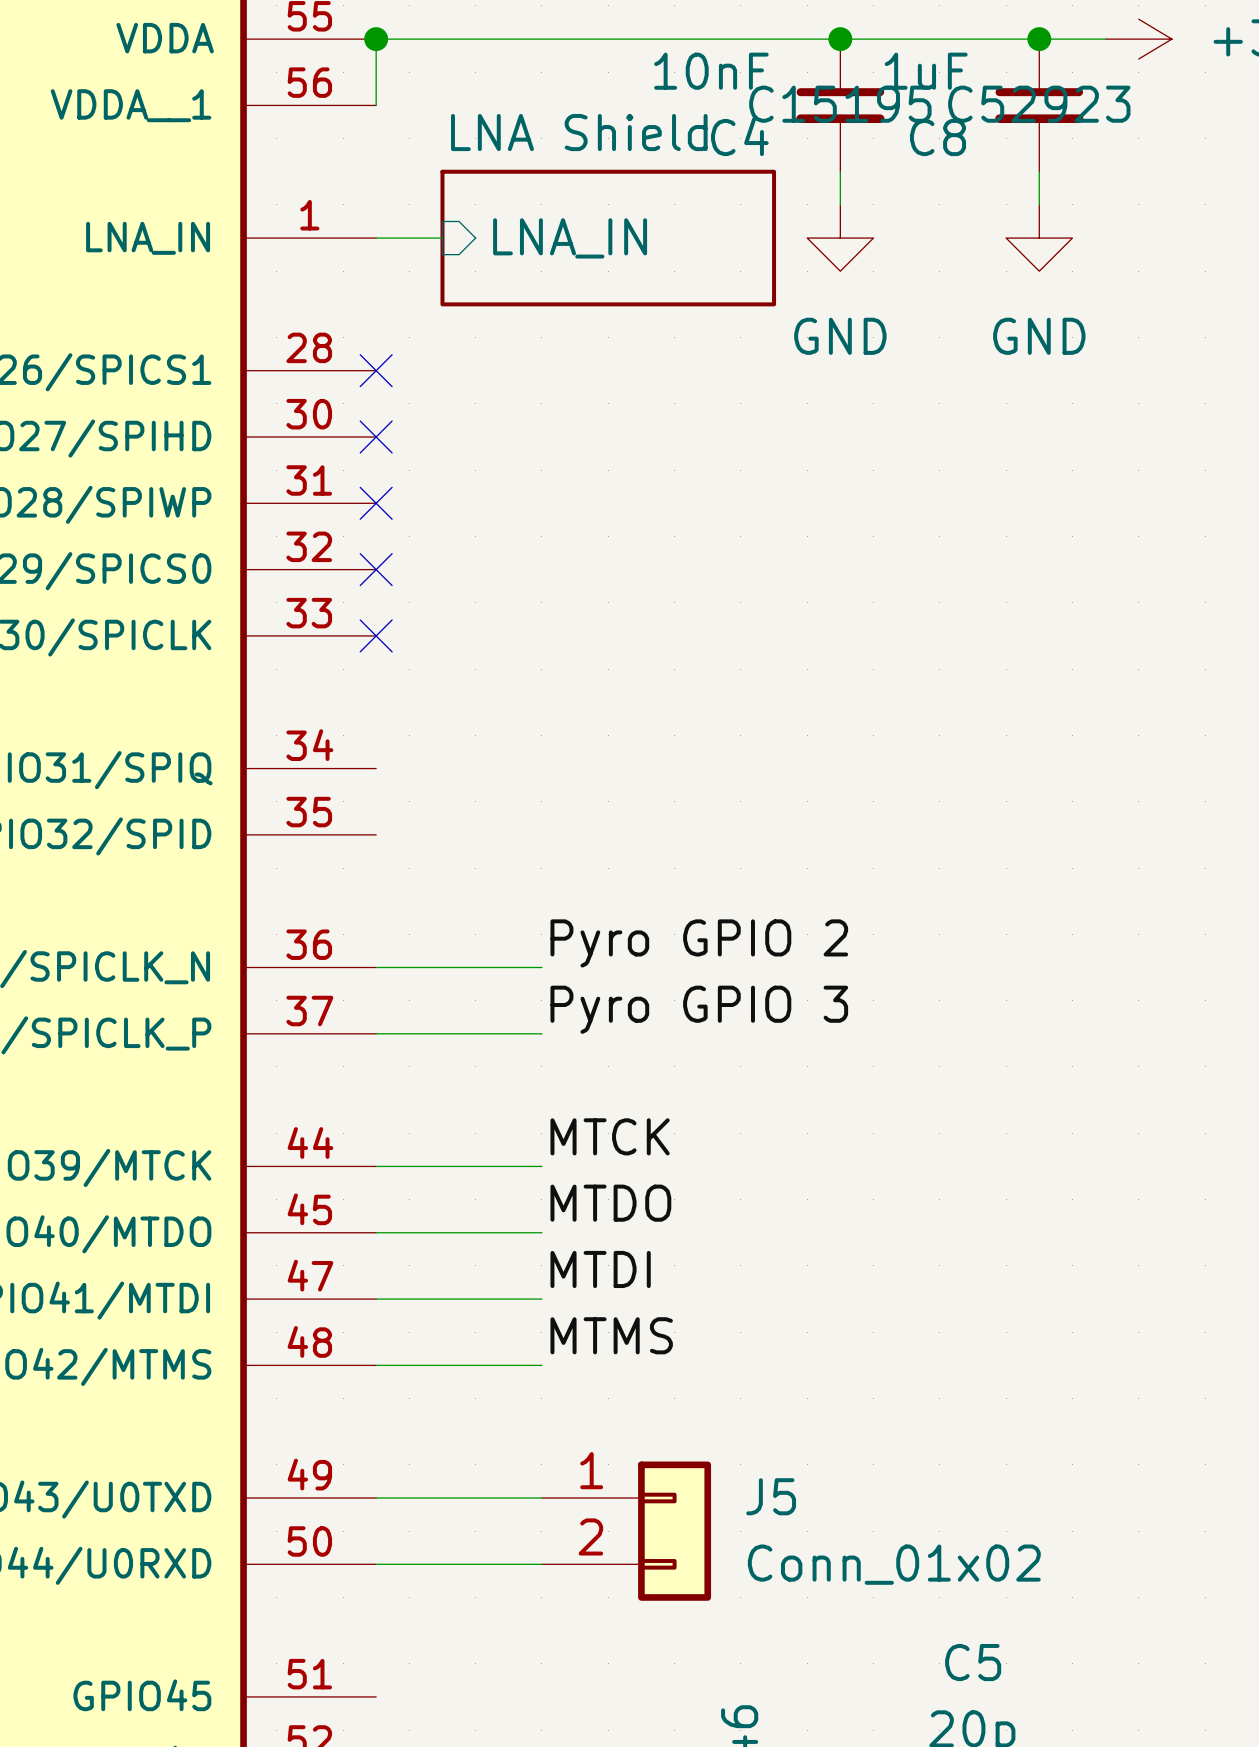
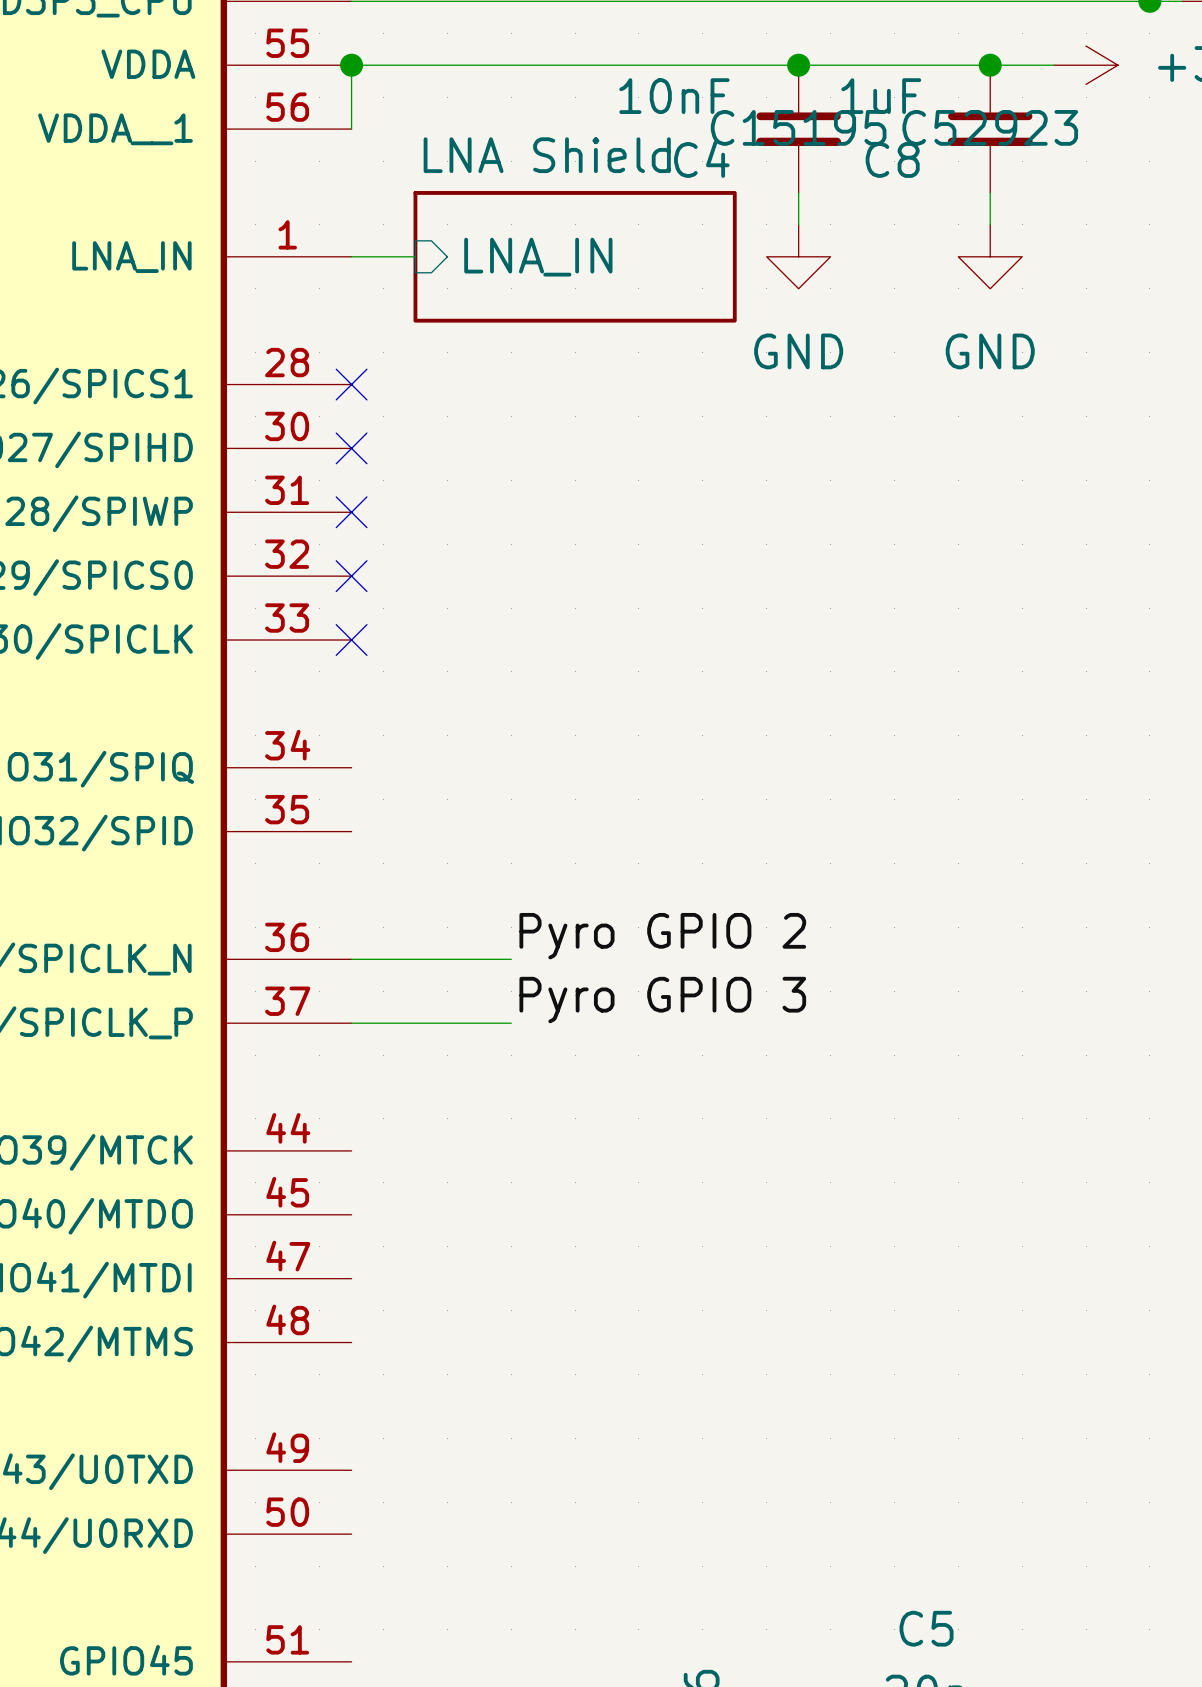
label: MTCK (610, 1136) -> none
wire: (376, 1166) (541, 1166) -> none
label: MTDO (610, 1203) -> none
wire: (376, 1232) (541, 1232) -> none
label: MTDI (600, 1269) -> none
wire: (376, 1299) (541, 1299) -> none
label: MTMS (611, 1335) -> none
wire: (376, 1365) (541, 1365) -> none
wire: (376, 1498) (541, 1498) -> none
J5: Conn_01x02 (626, 1531) -> none
wire: (376, 1564) (541, 1564) -> none

